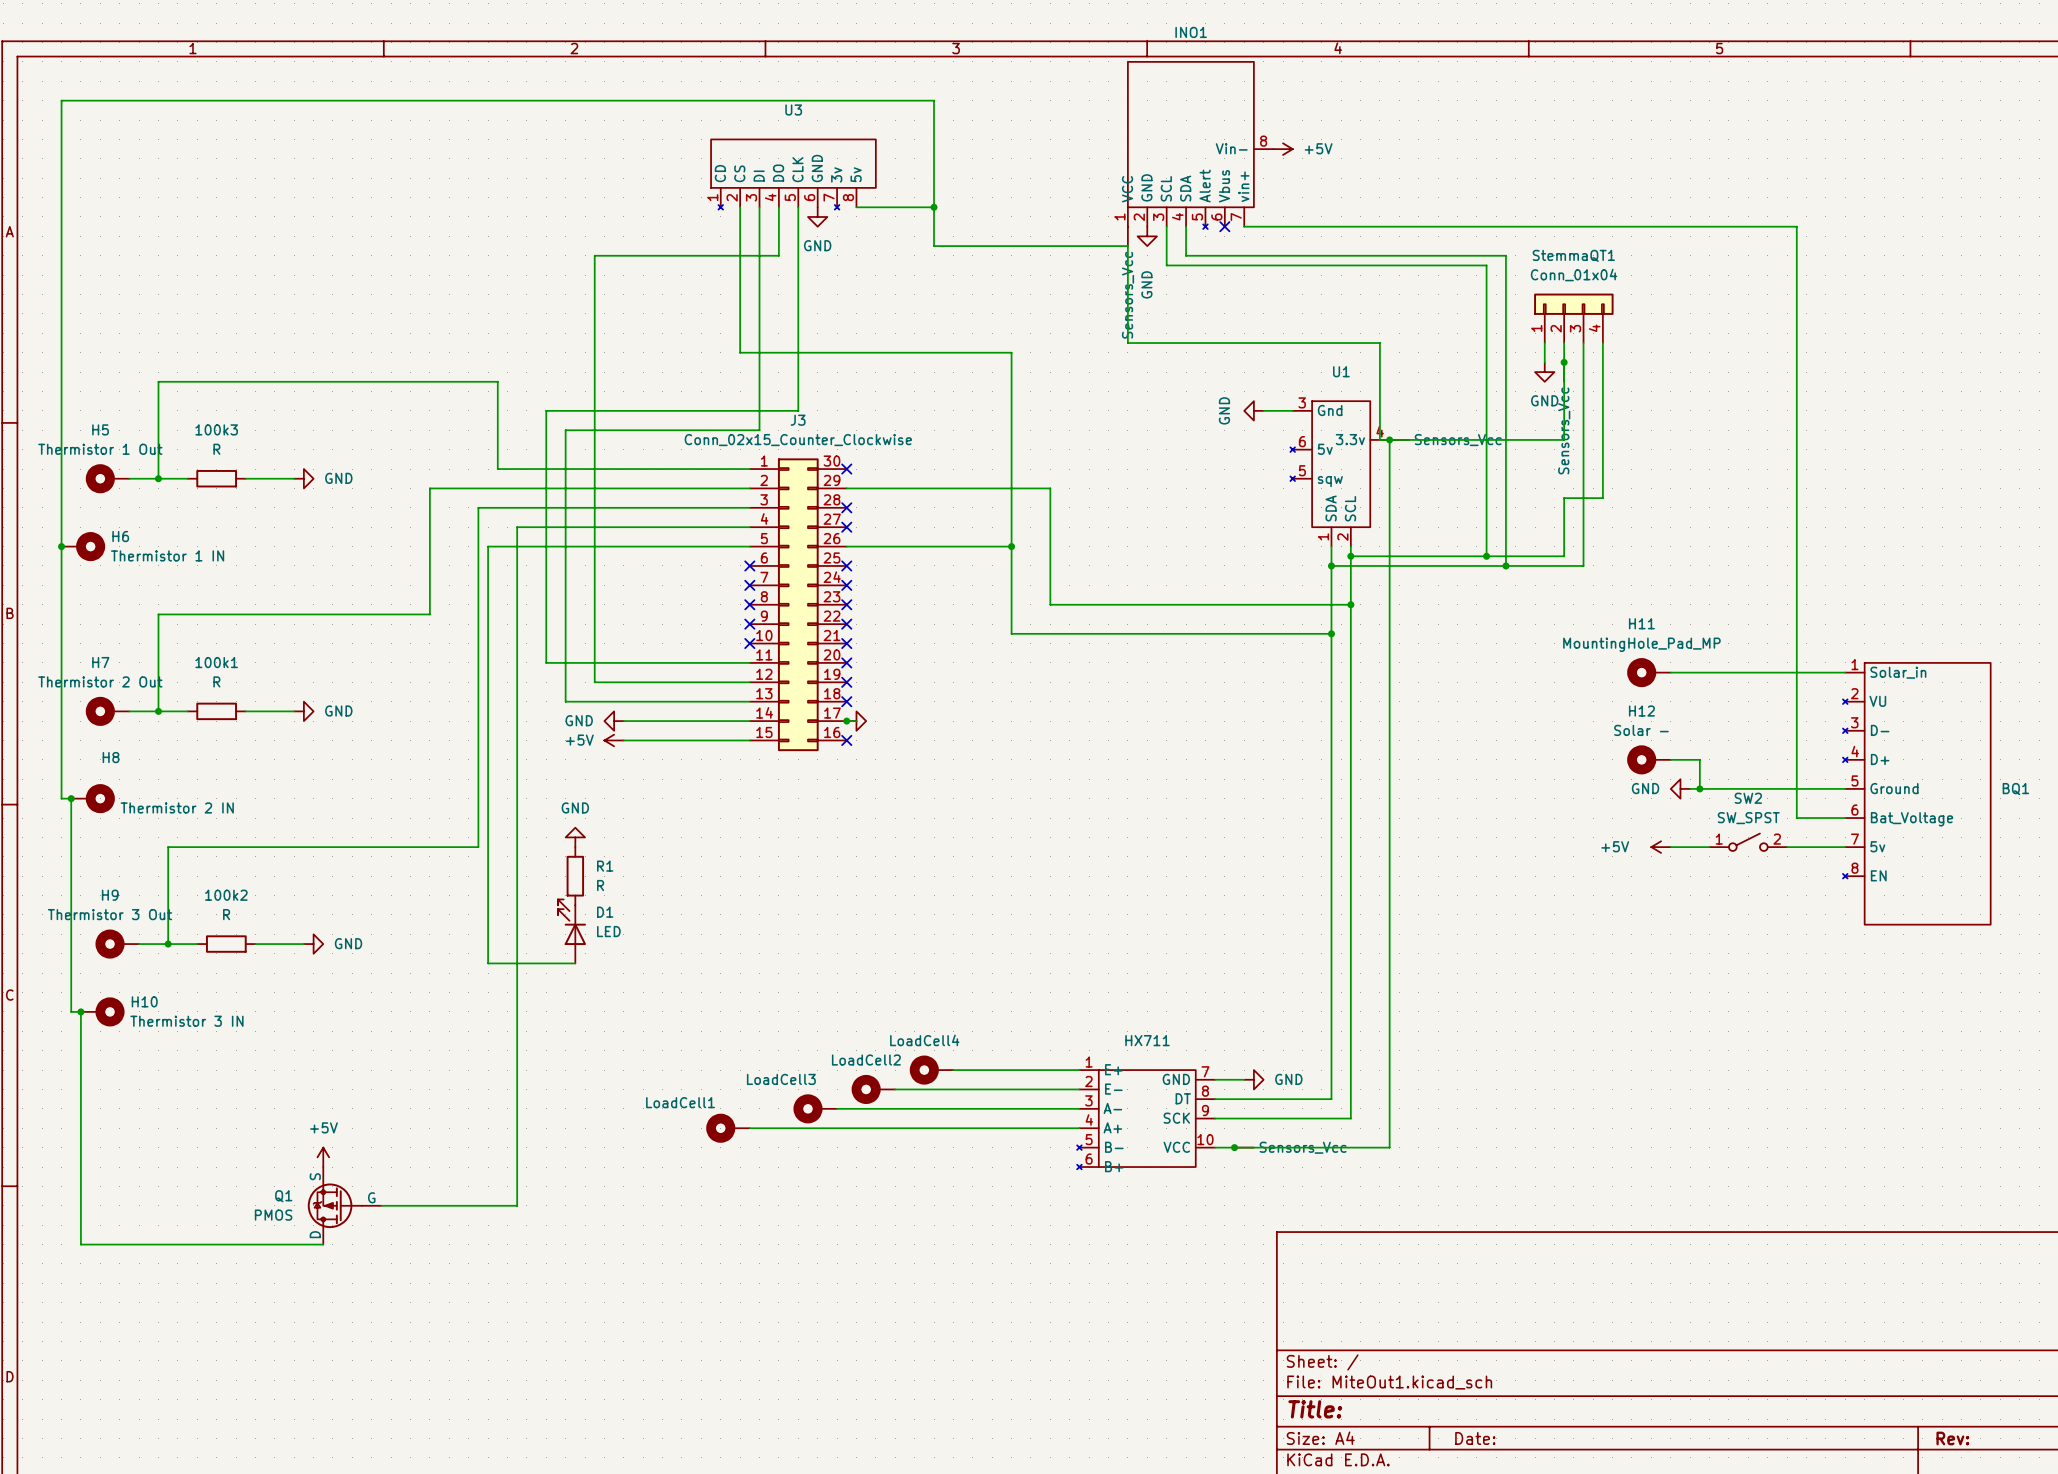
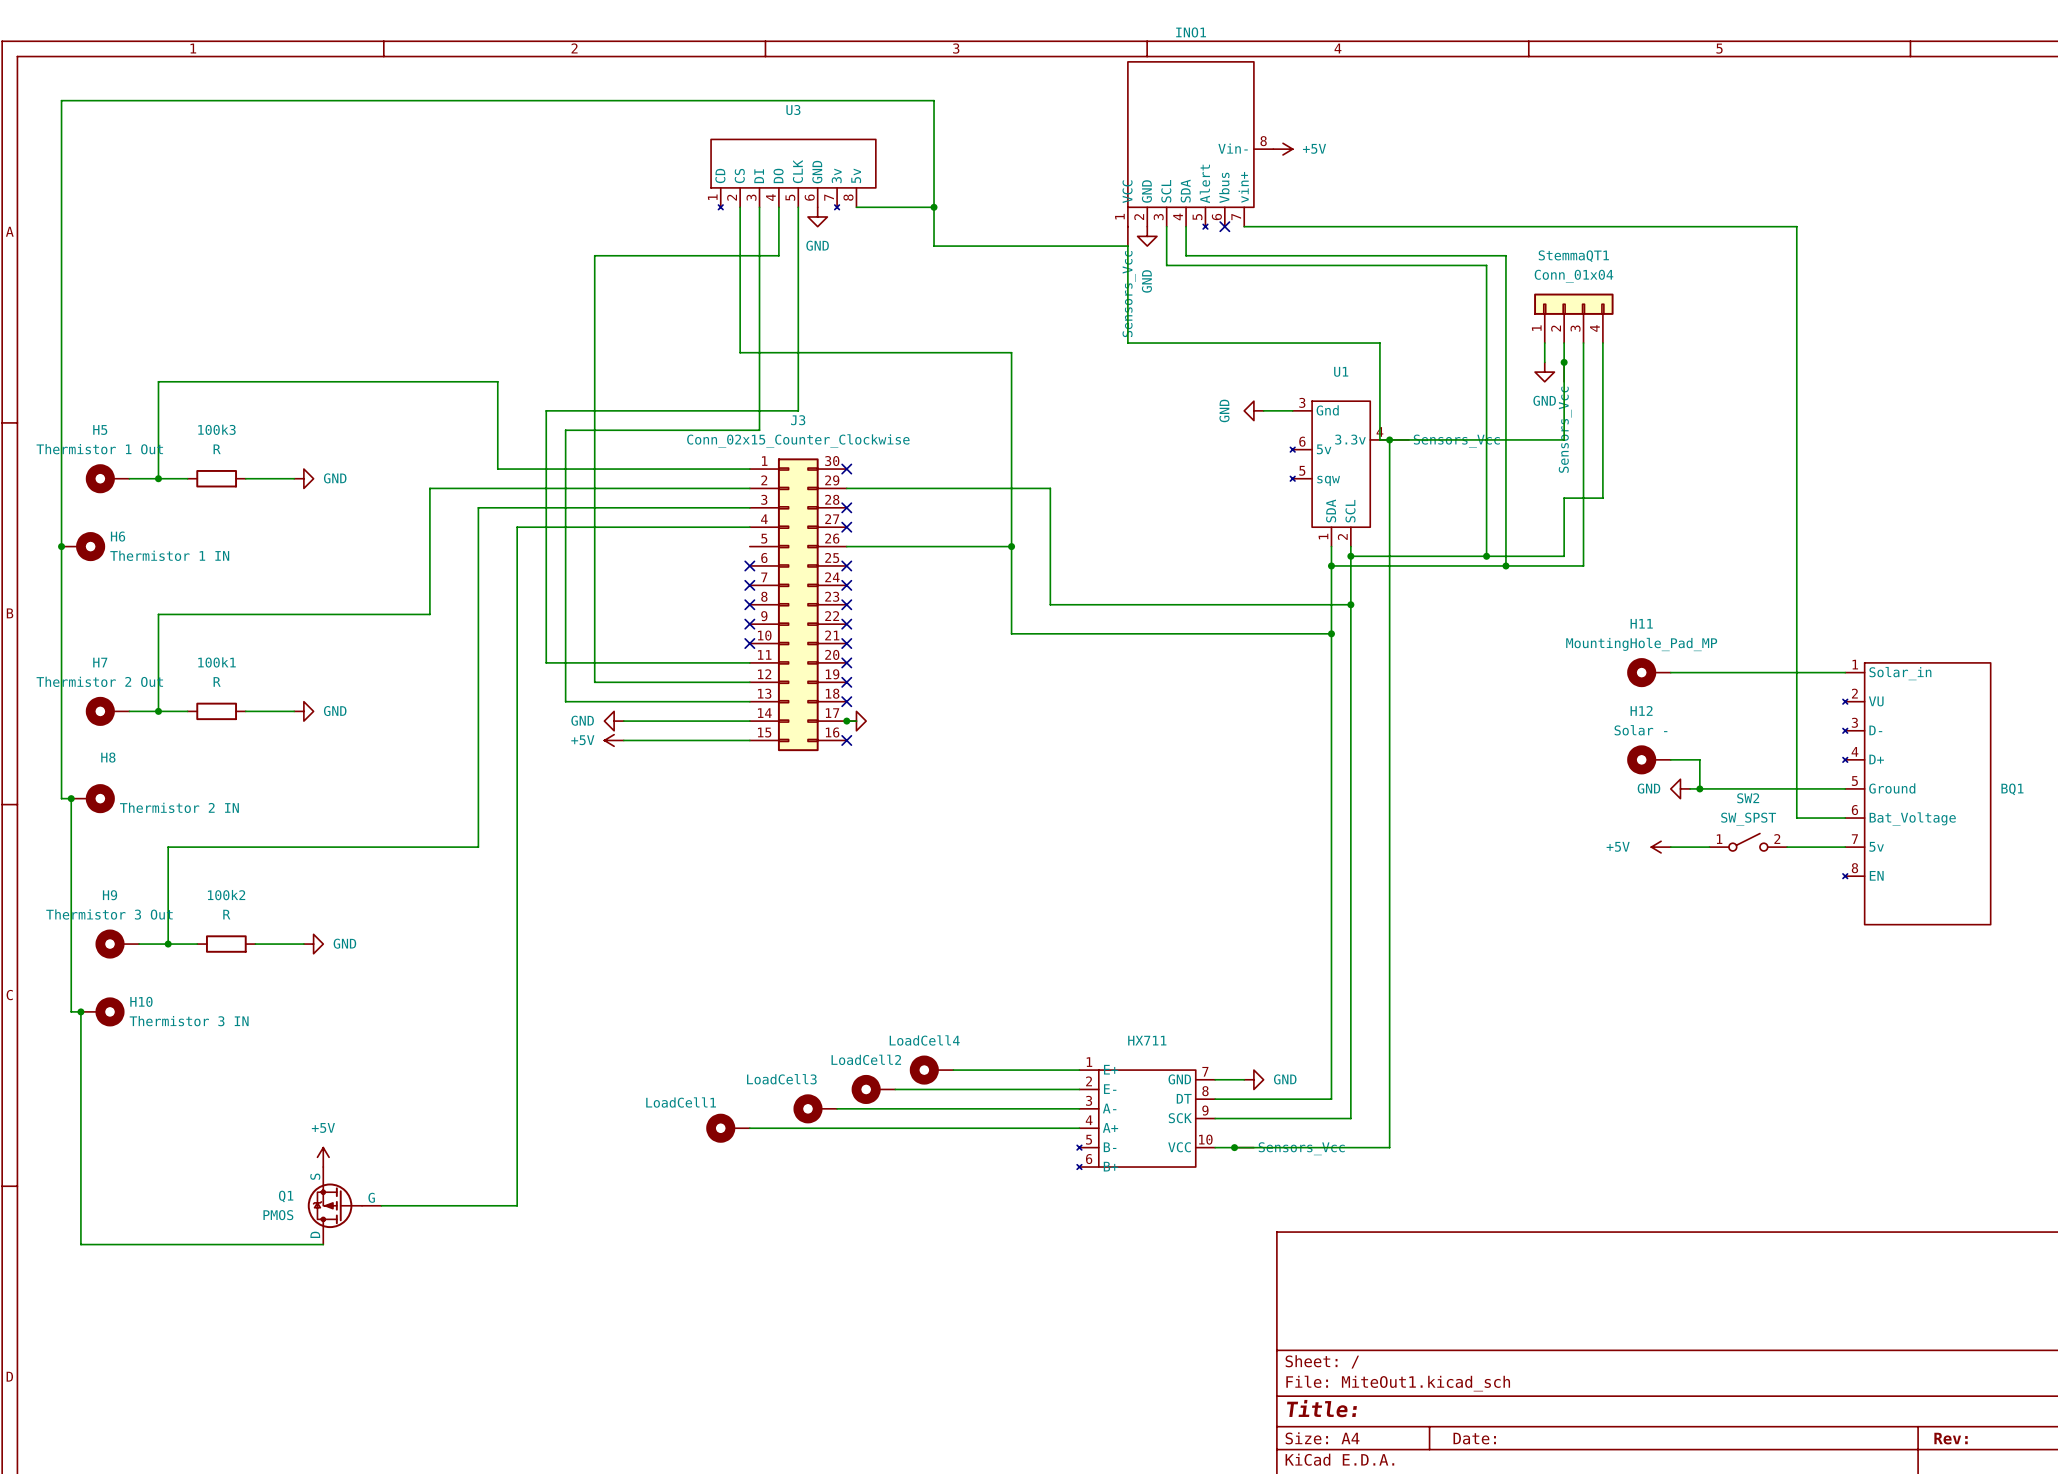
wire: (749, 546) (488, 546) (488, 963) (575, 963) -> none
power symbol: GND (575, 837) -> none
R1: R (575, 876) -> none
D1: LED (571, 931) -> none

